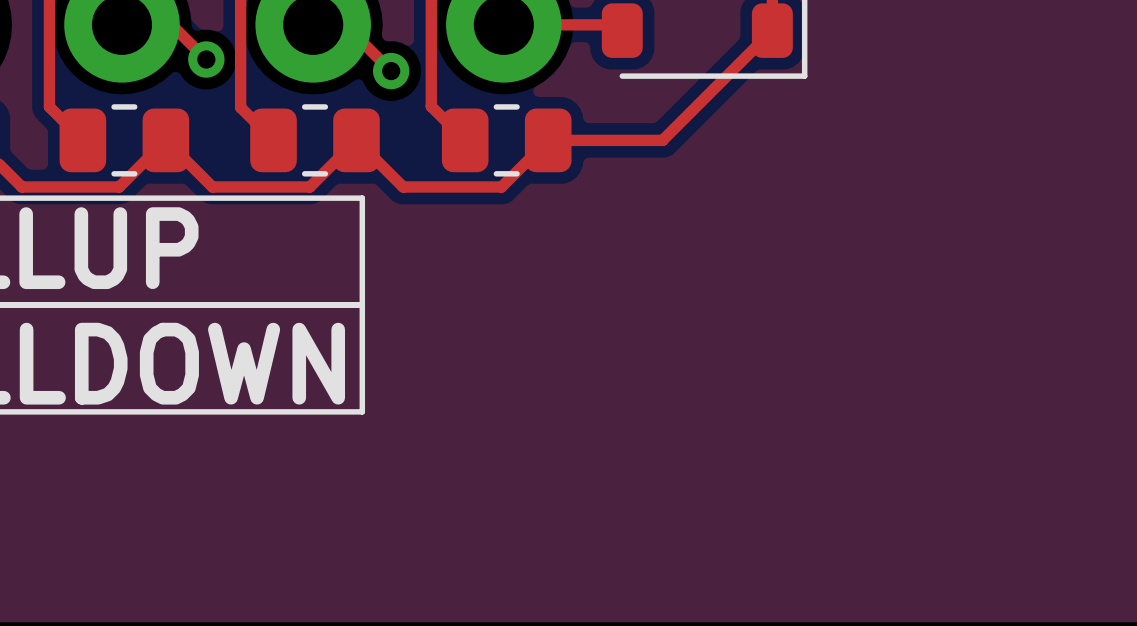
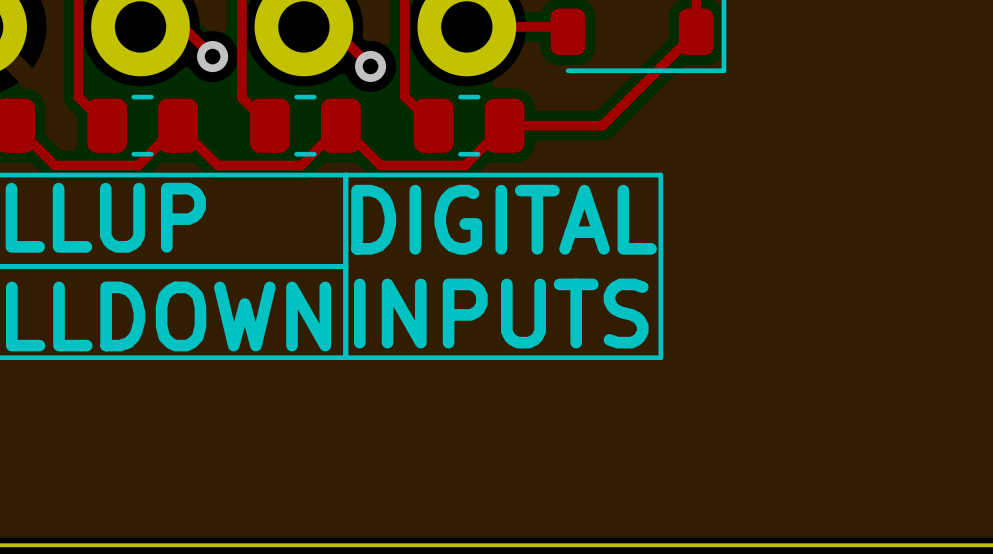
line: none -> (345, 175) (660, 175) (660, 357) (345, 357)
text: none -> DIGITAL (504, 219)
text: none -> INPUTS (501, 313)

